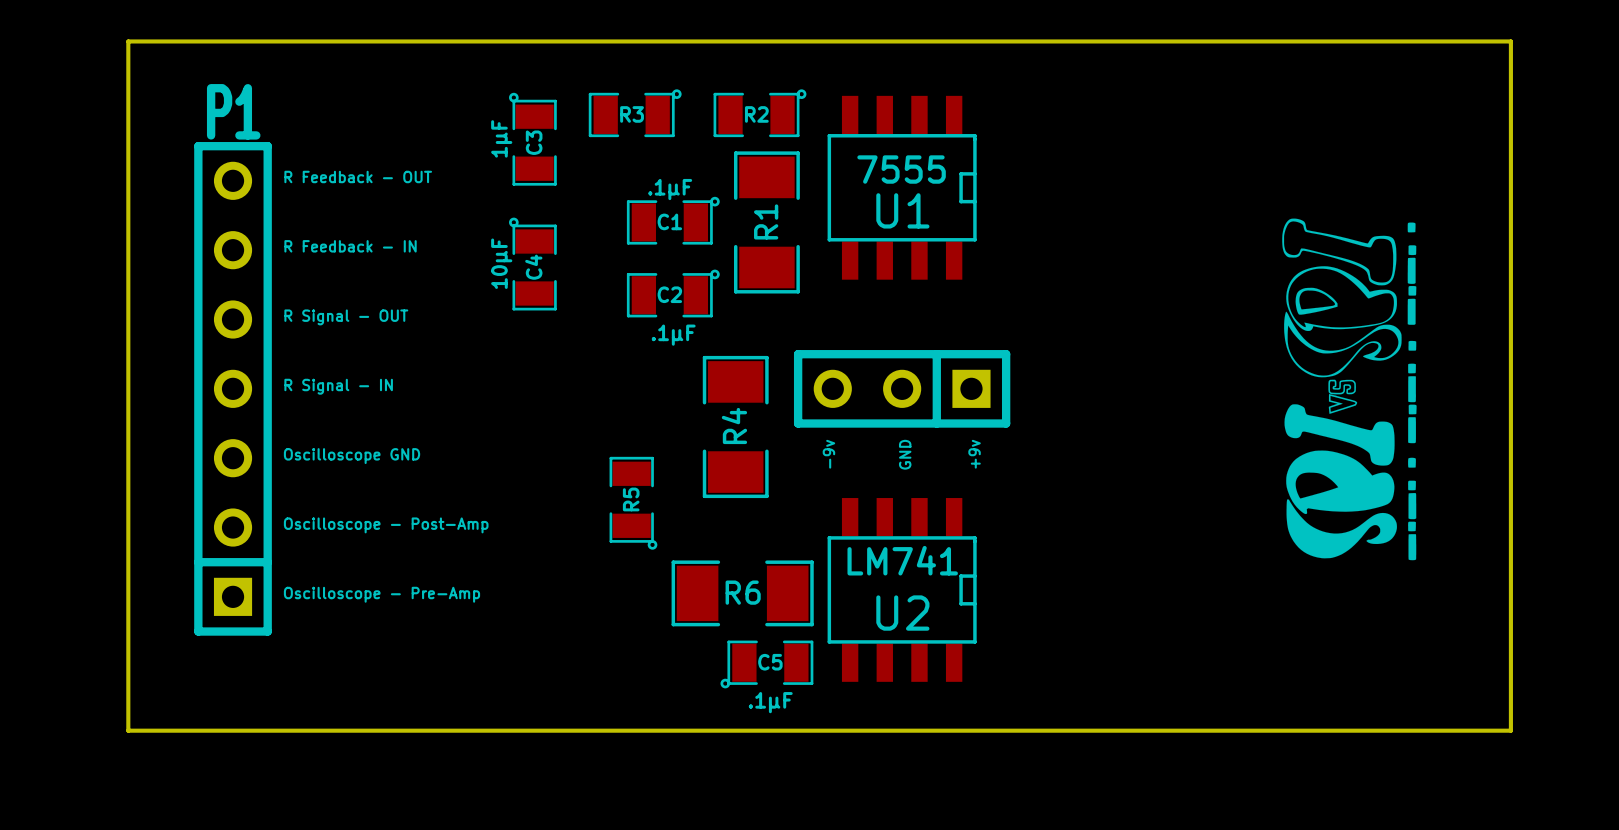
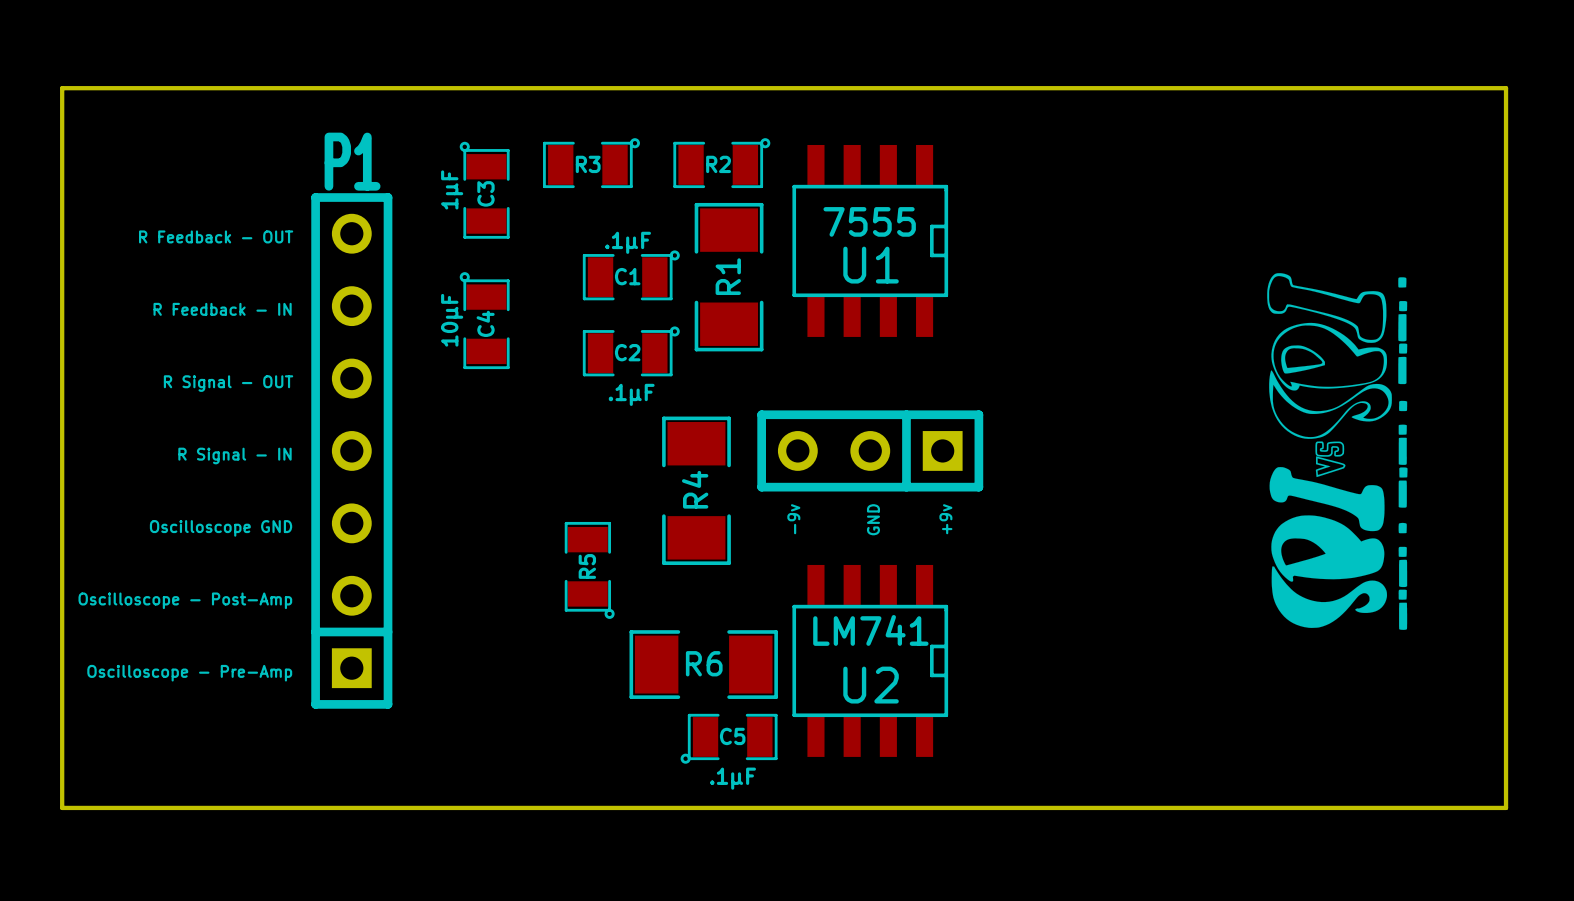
text position: R Feedback - OUT (358, 176) -> R Feedback - OUT (216, 236)
text position: R Feedback - IN (350, 246) -> R Feedback - IN (222, 309)
text position: R Signal - OUT (346, 317) -> R Signal - OUT (228, 383)
text position: R Signal - IN (338, 386) -> R Signal - IN (234, 455)
P1 position: (233, 388) -> (351, 450)
text position: Oscilloscope GND (352, 456) -> Oscilloscope GND (221, 528)
text position: Oscilloscope - Post-Amp (386, 525) -> Oscilloscope - Post-Amp (185, 600)
text position: Oscilloscope - Pre-Amp (381, 594) -> Oscilloscope - Pre-Amp (189, 673)

